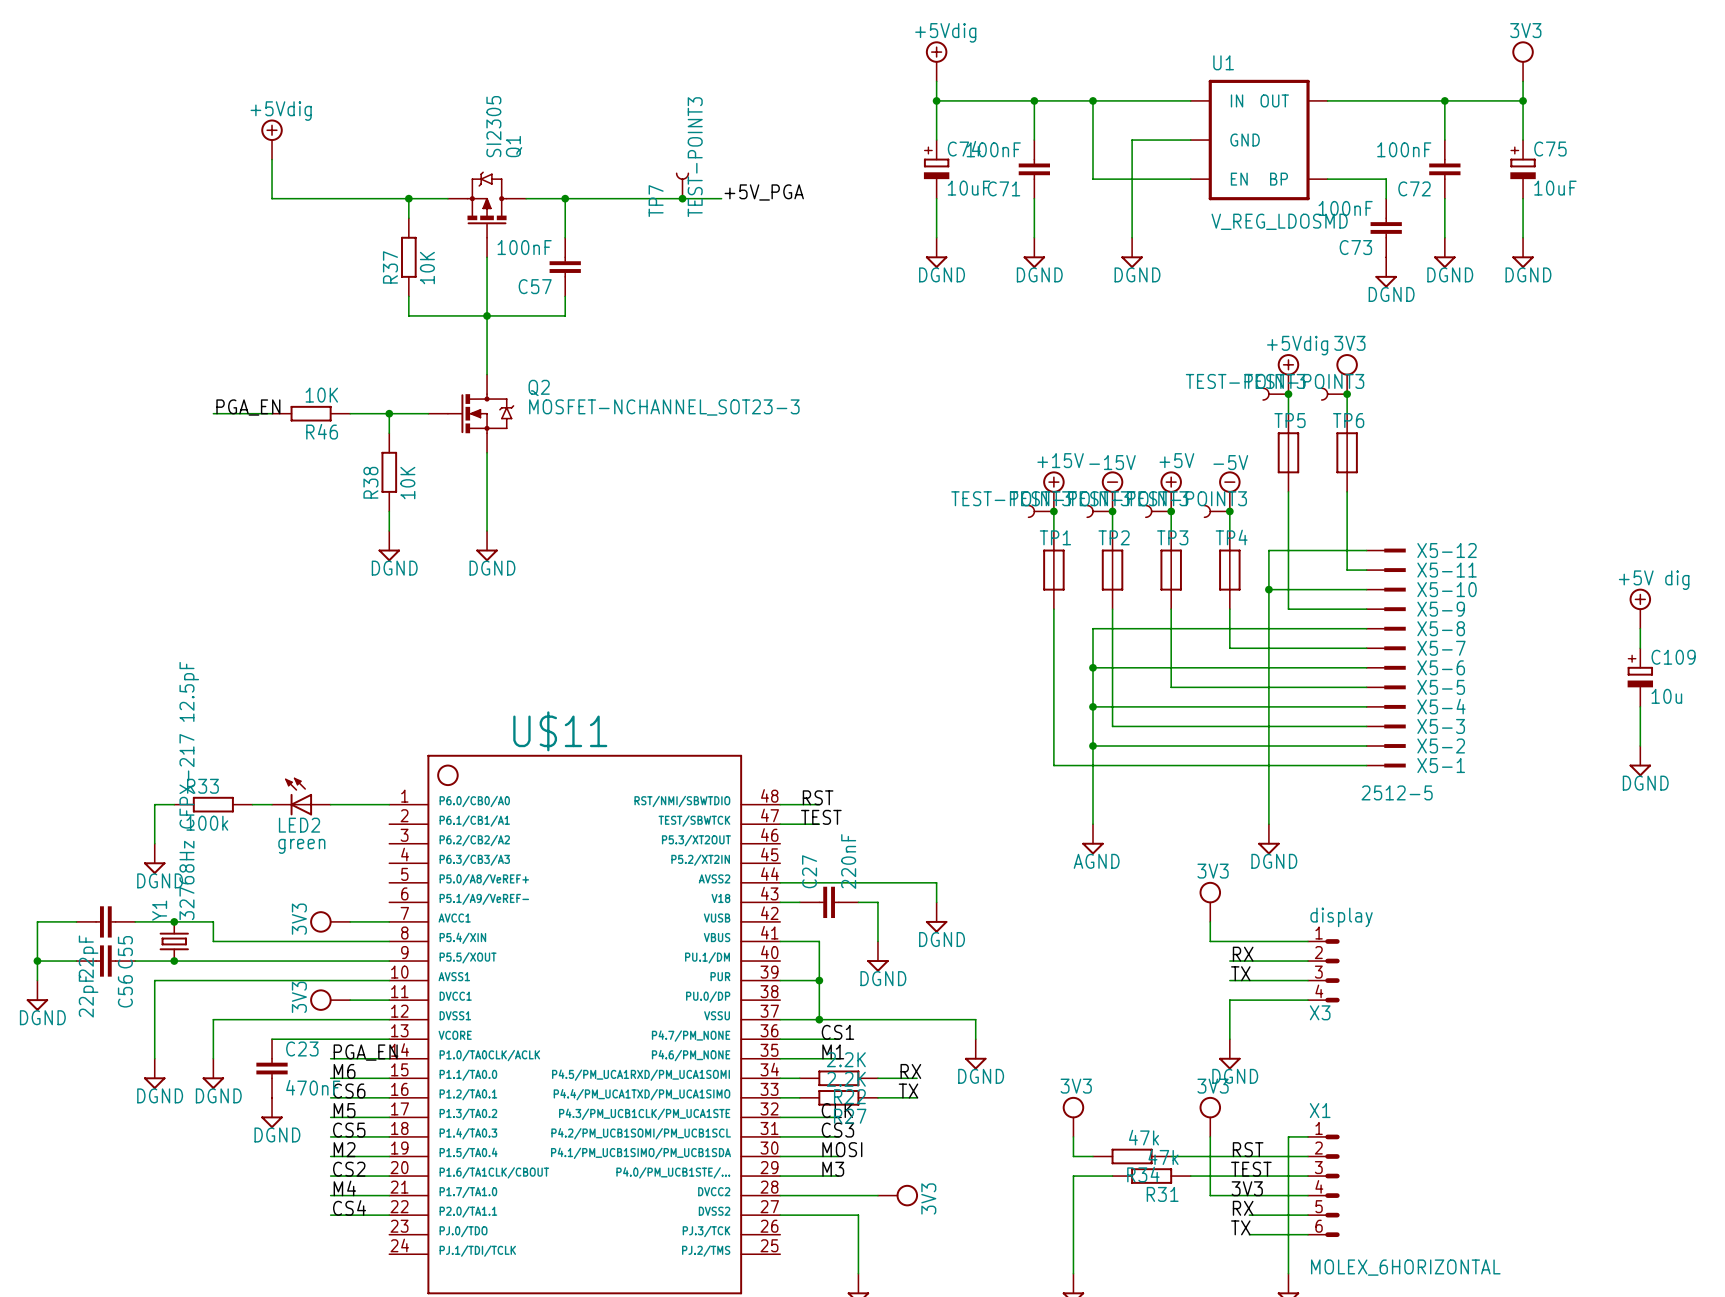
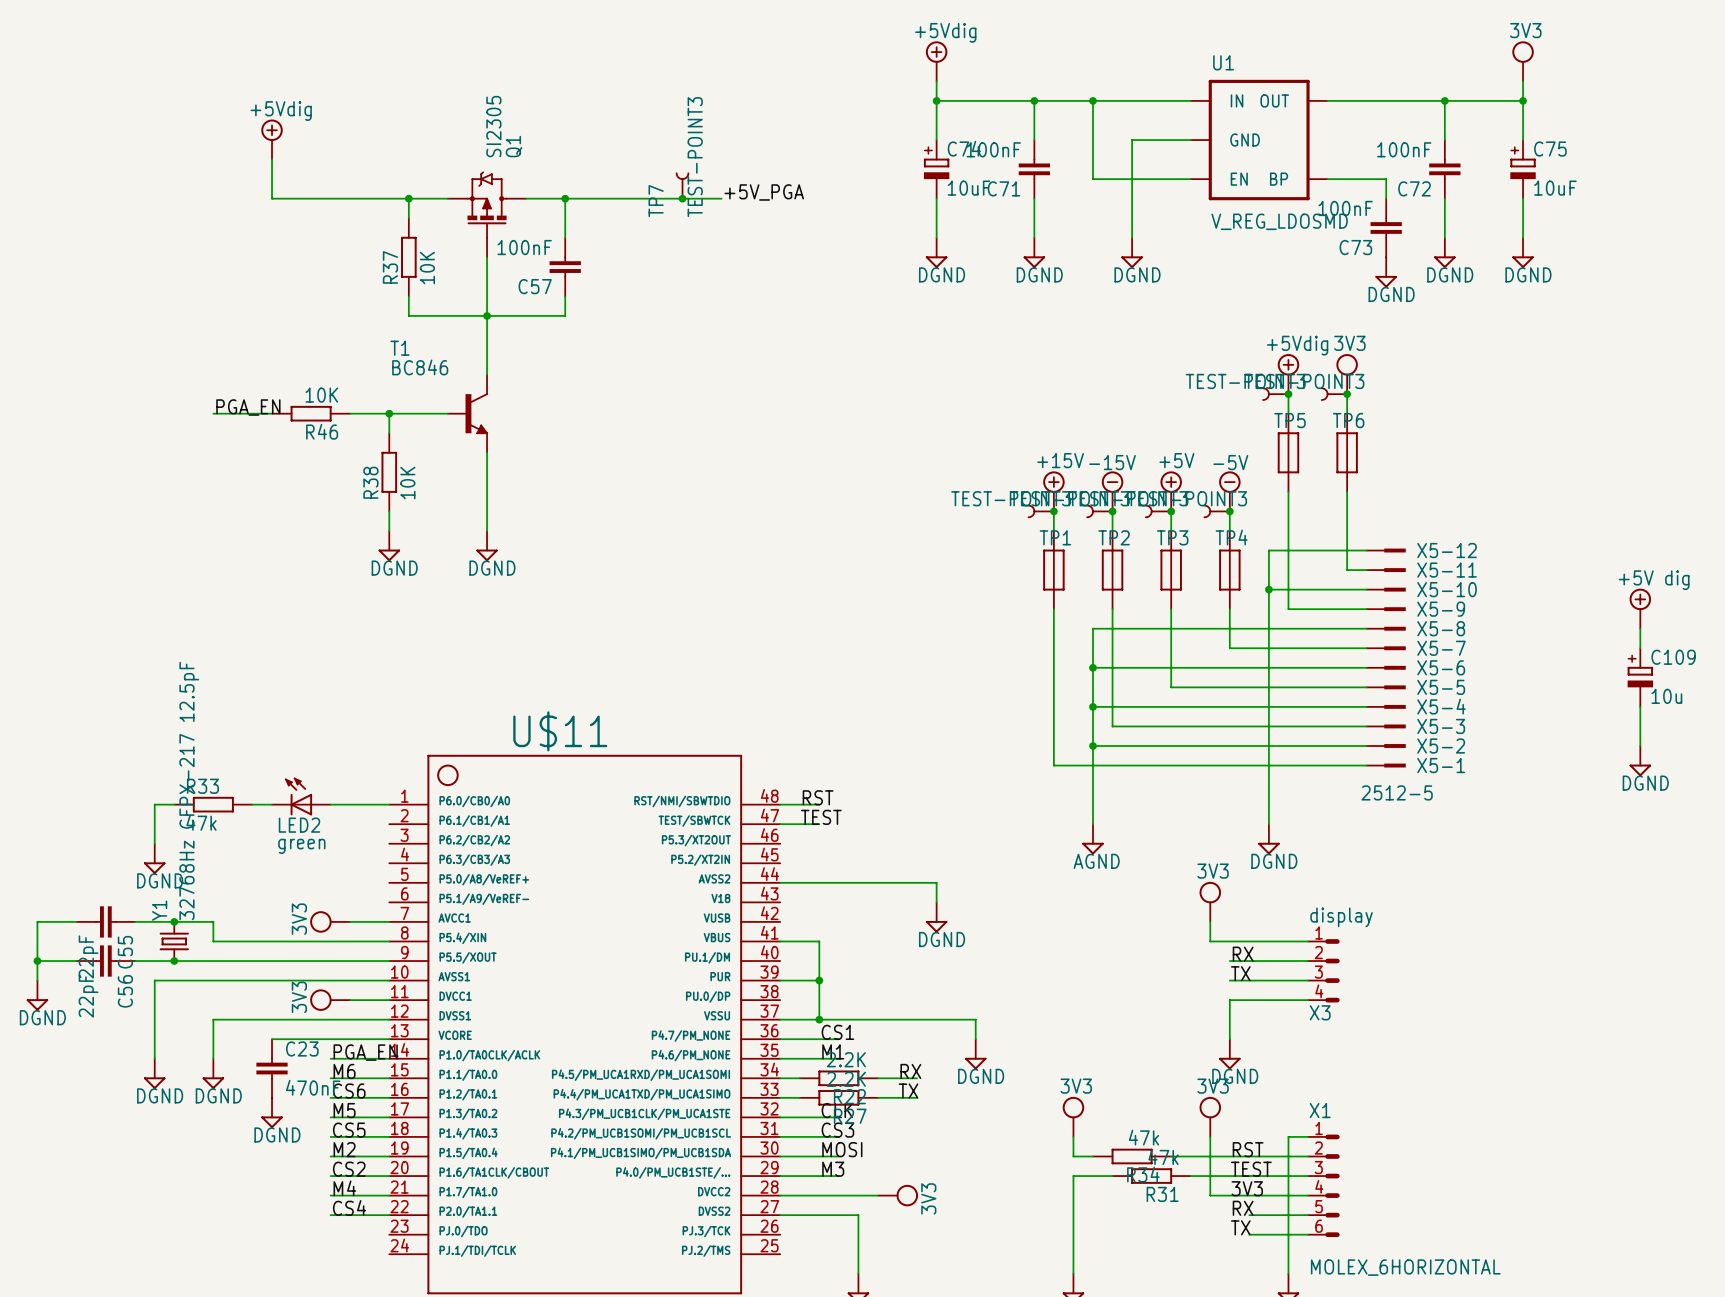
T1: none -> BC846 (467, 413)
Q2: MOSFET-NCHANNEL_SOT23-3 (471, 413) -> none
R33 value: 100k (207, 823) -> 47k (201, 822)
wire: (780, 902) (799, 902) -> none
C27: 220nF (829, 902) -> none
wire: (858, 902) (877, 902) (877, 941) -> none
power symbol: DGND (877, 956) -> none

